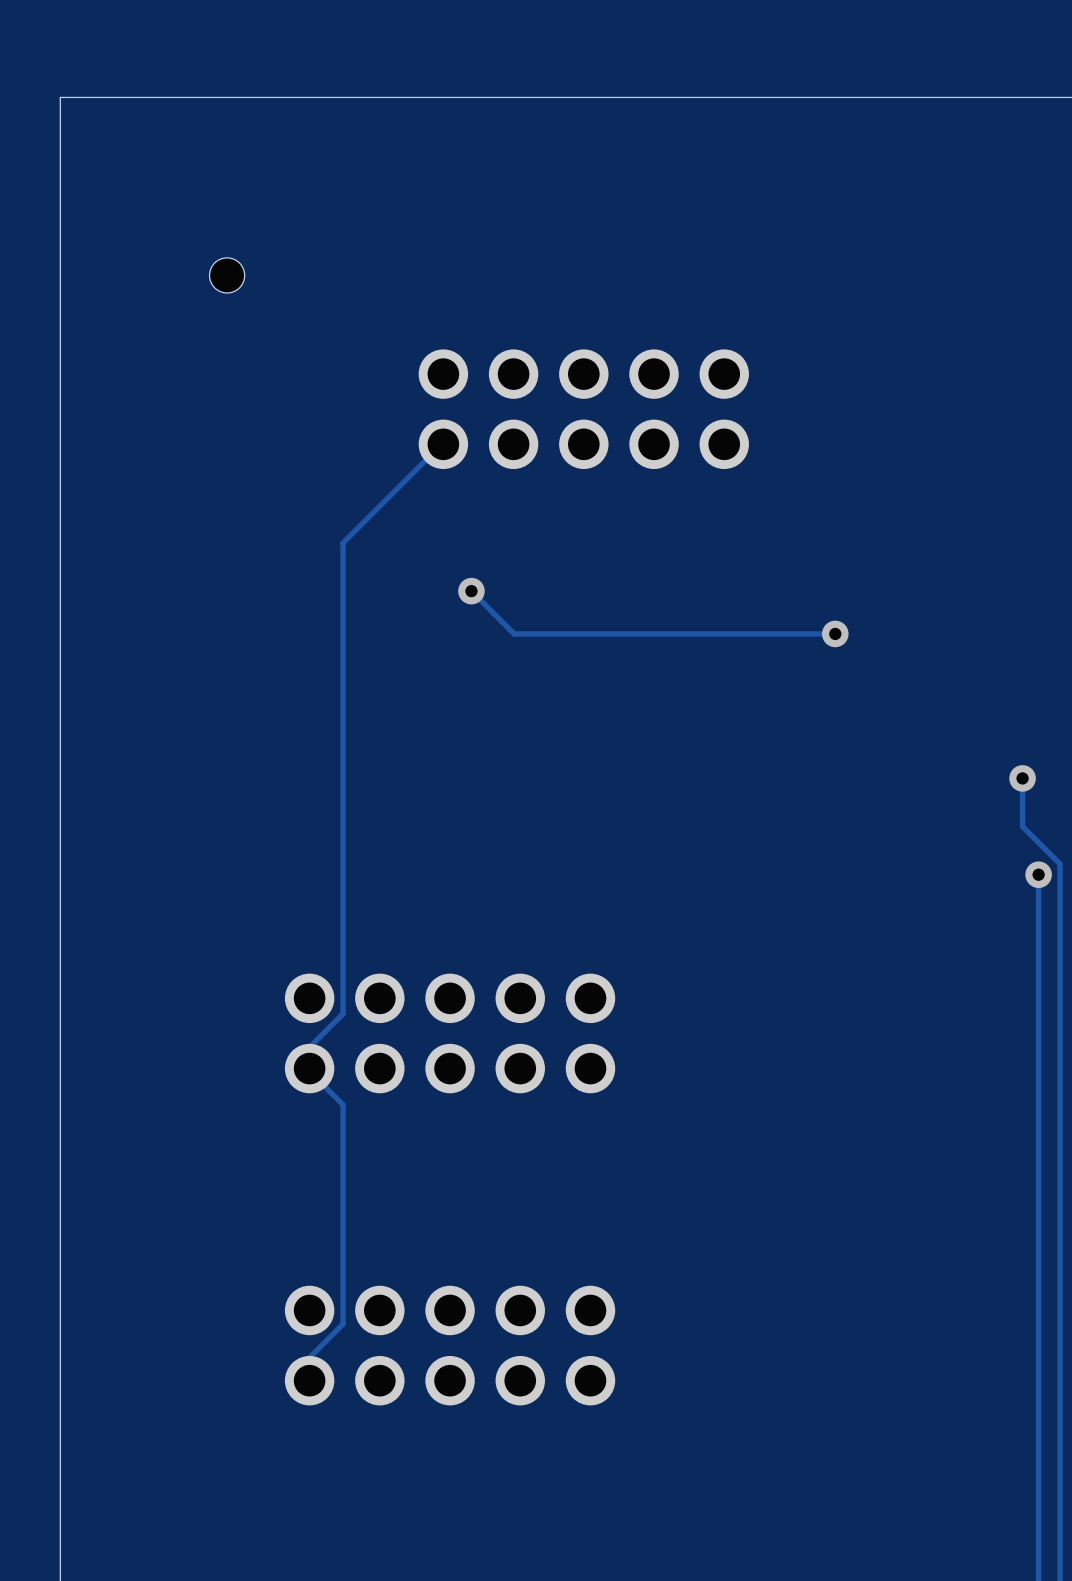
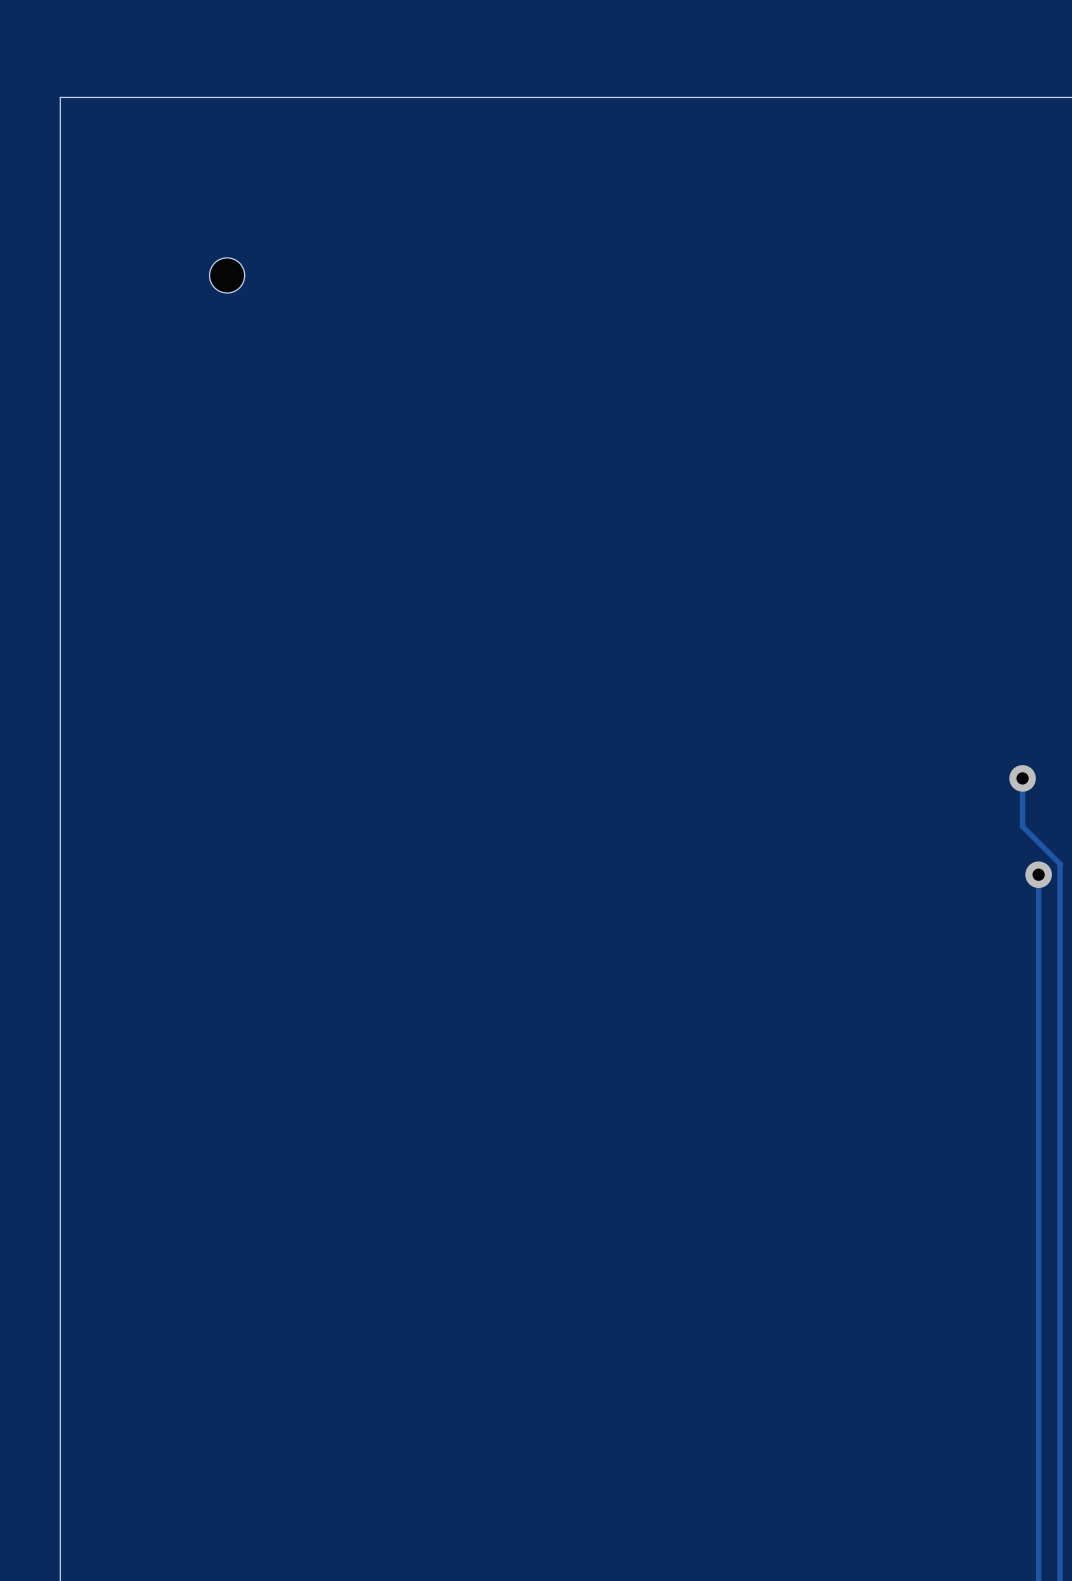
part: (583, 409) -> none
track: (443, 444) (343, 542) (343, 1013) (310, 1045) (309, 1068) (310, 1072) (343, 1104) (343, 1324) (310, 1356) (309, 1380) -> none
track: (471, 591) (514, 633) (835, 633) -> none
via: (471, 591) -> none
via: (835, 633) -> none
part: (450, 1033) -> none
part: (450, 1345) -> none

